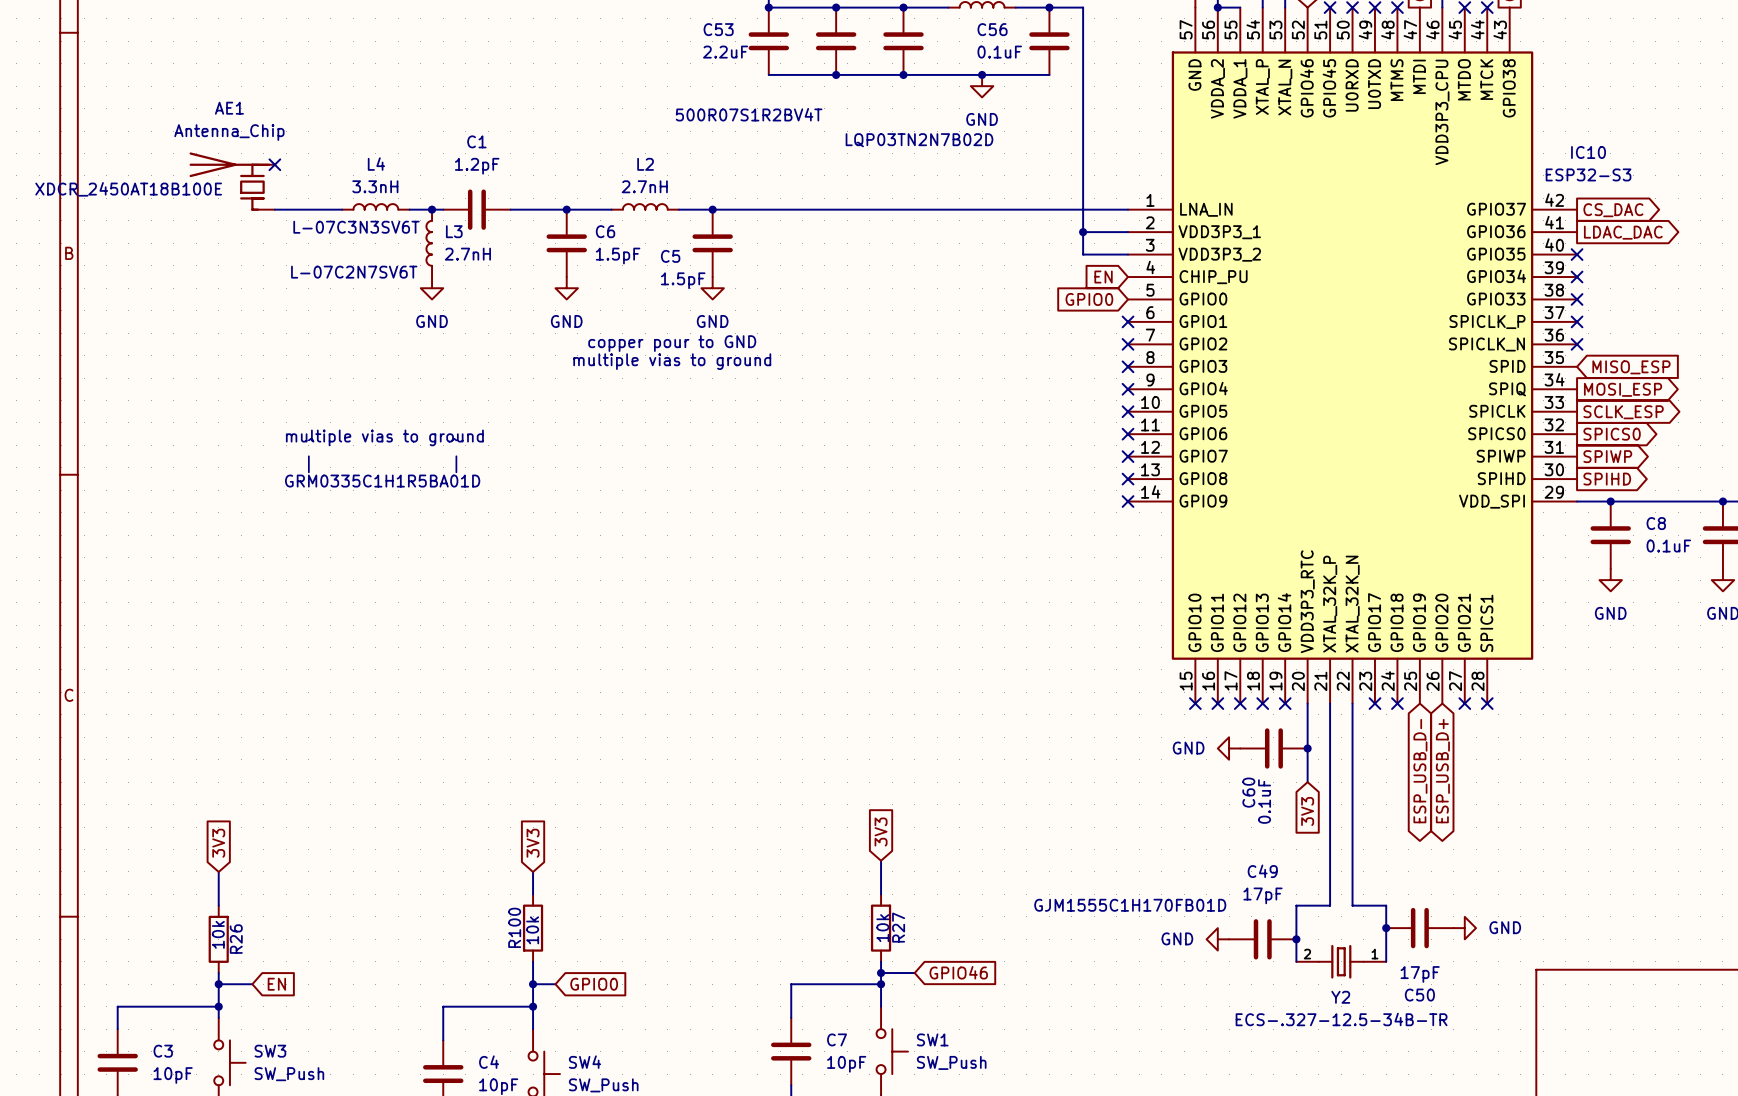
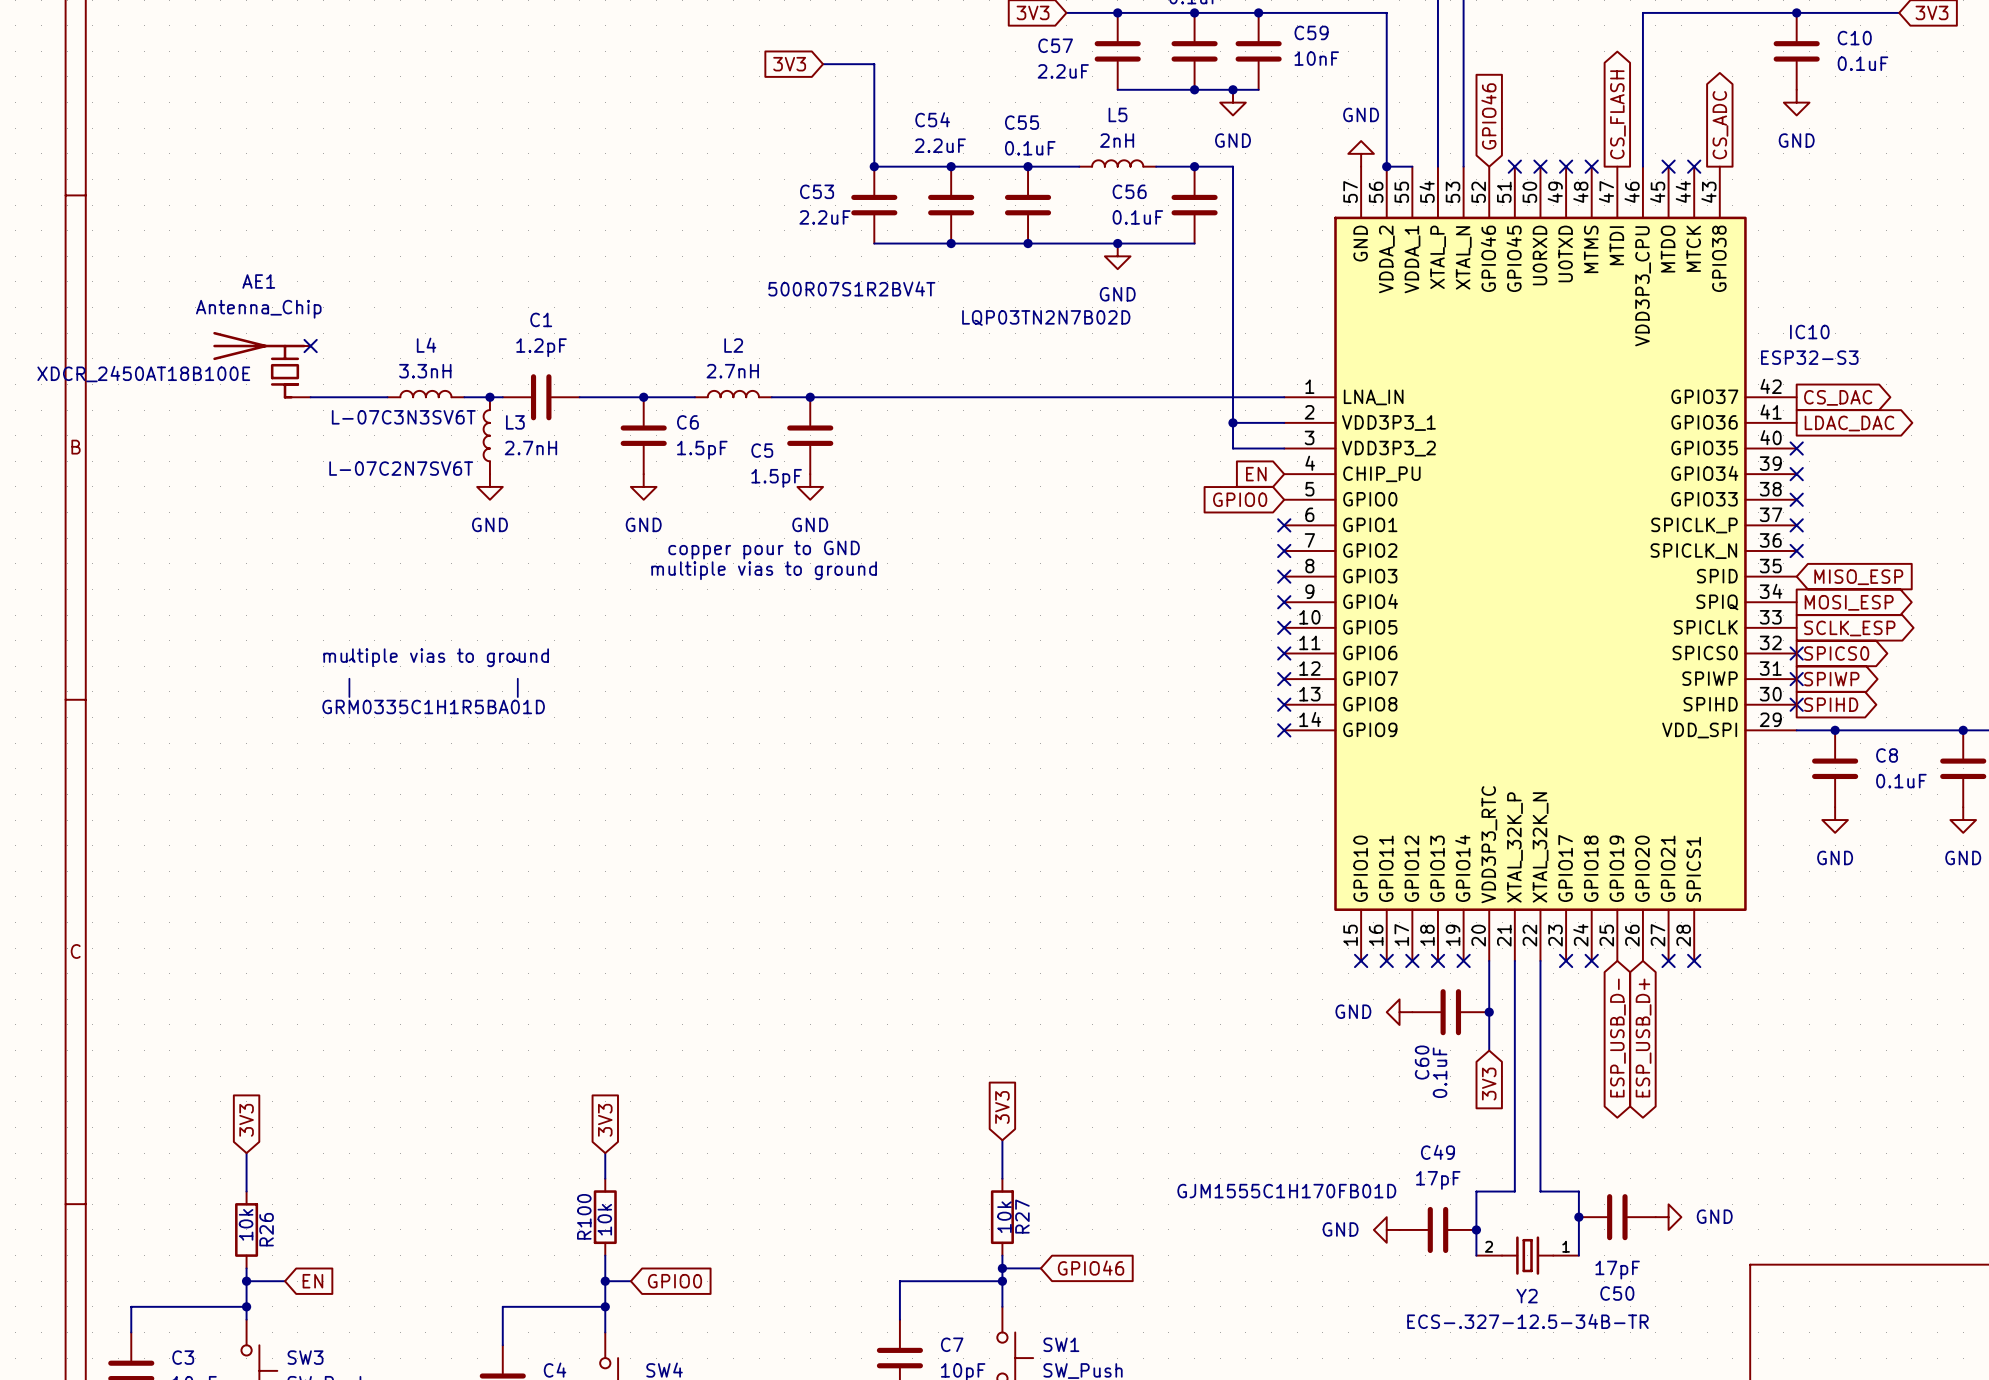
no-connect mark: none -> (1796, 653)
no-connect mark: none -> (1796, 679)
no-connect mark: none -> (1796, 704)

